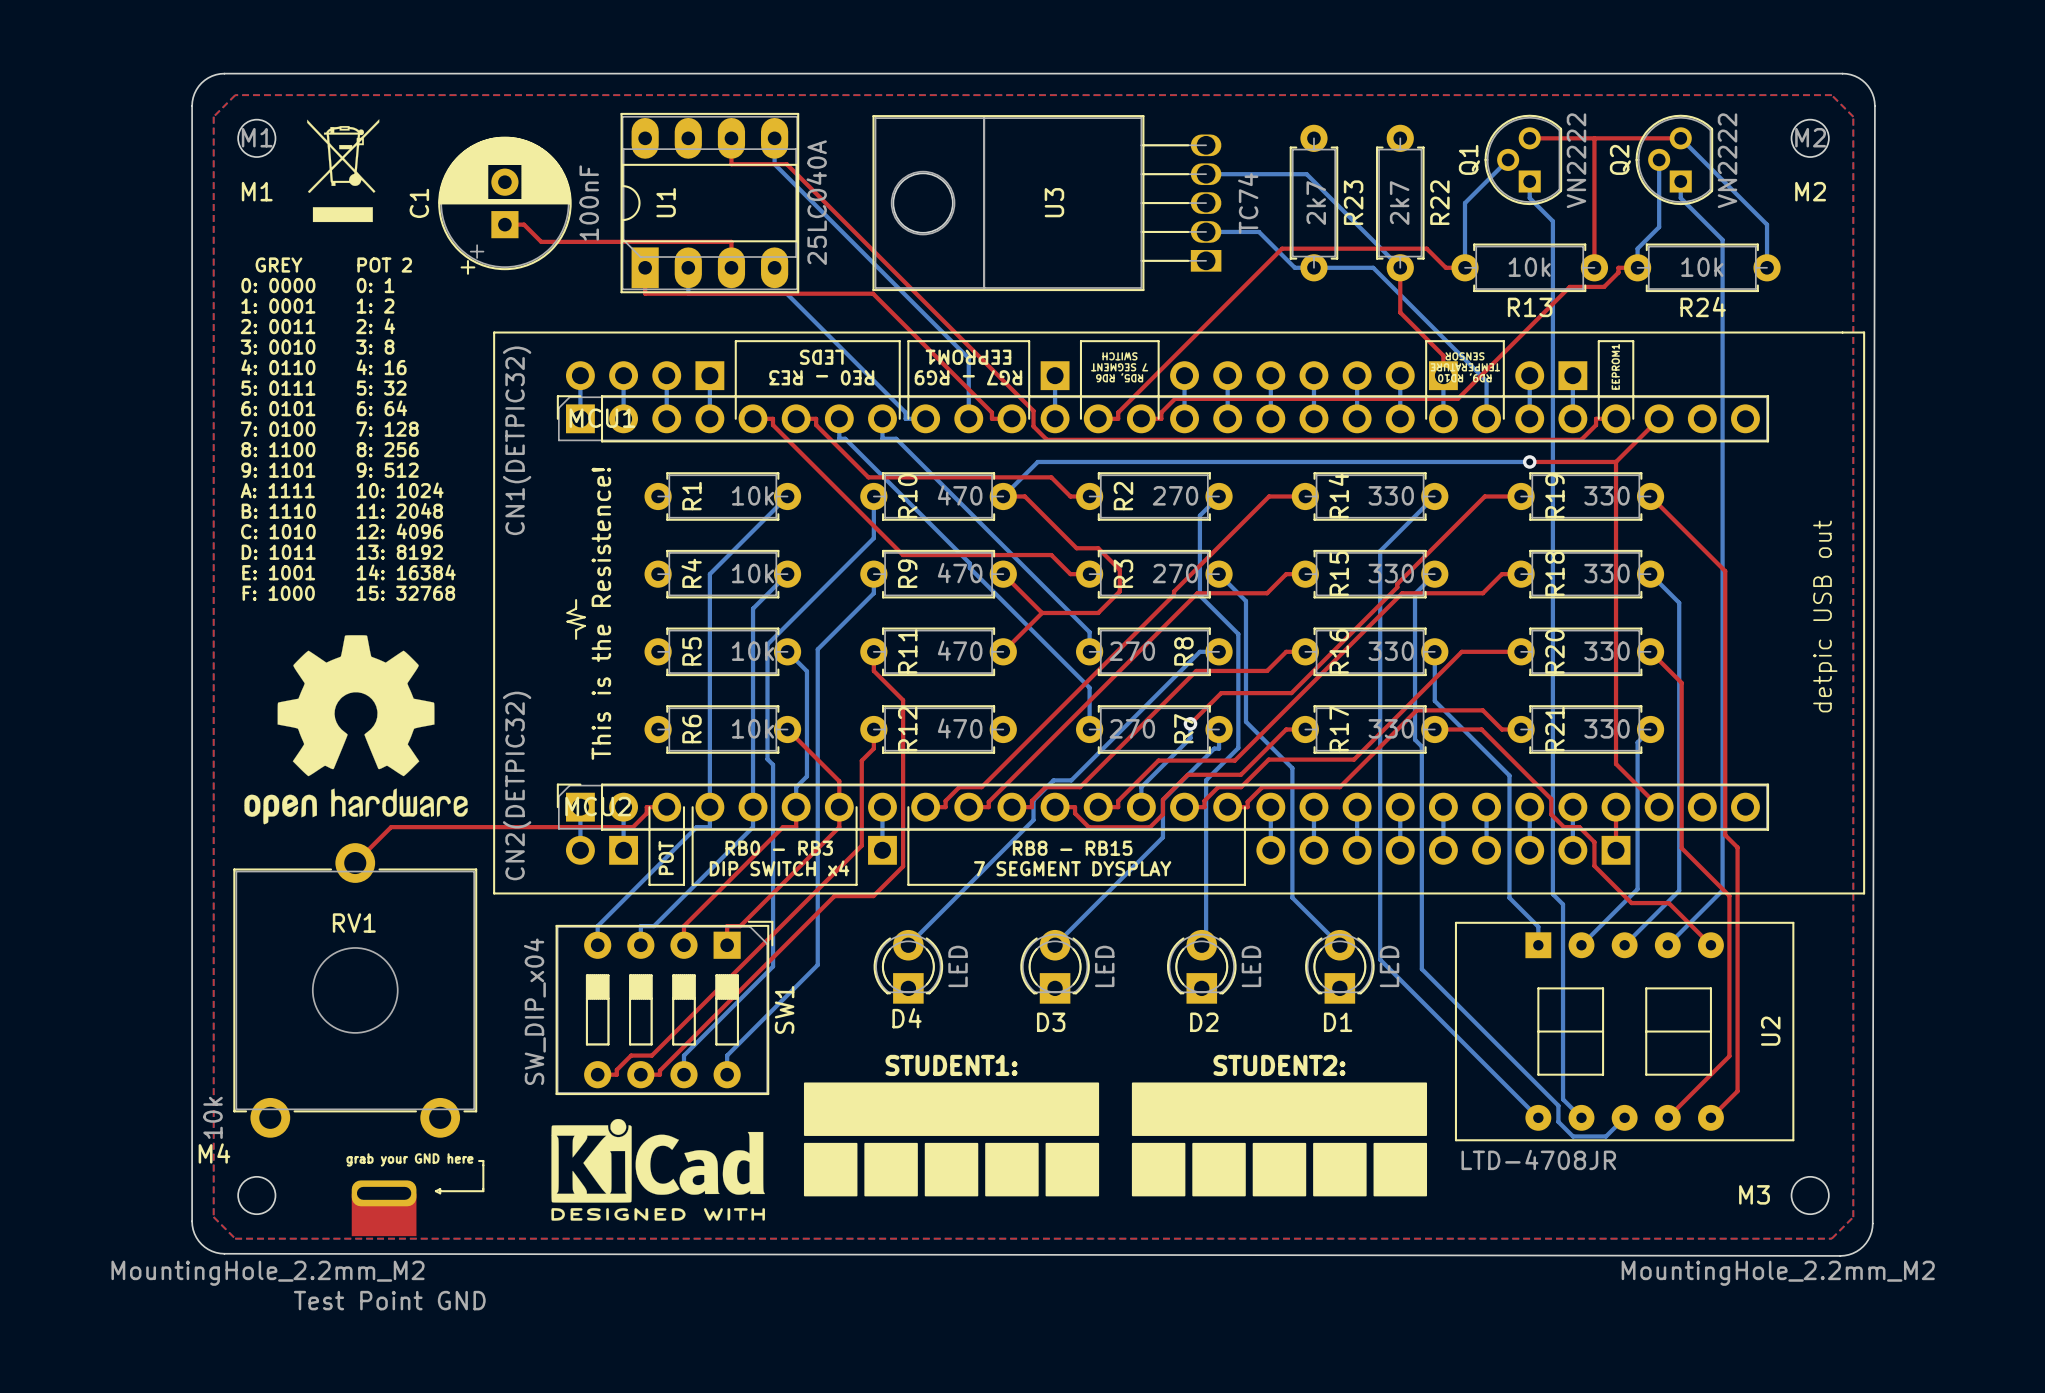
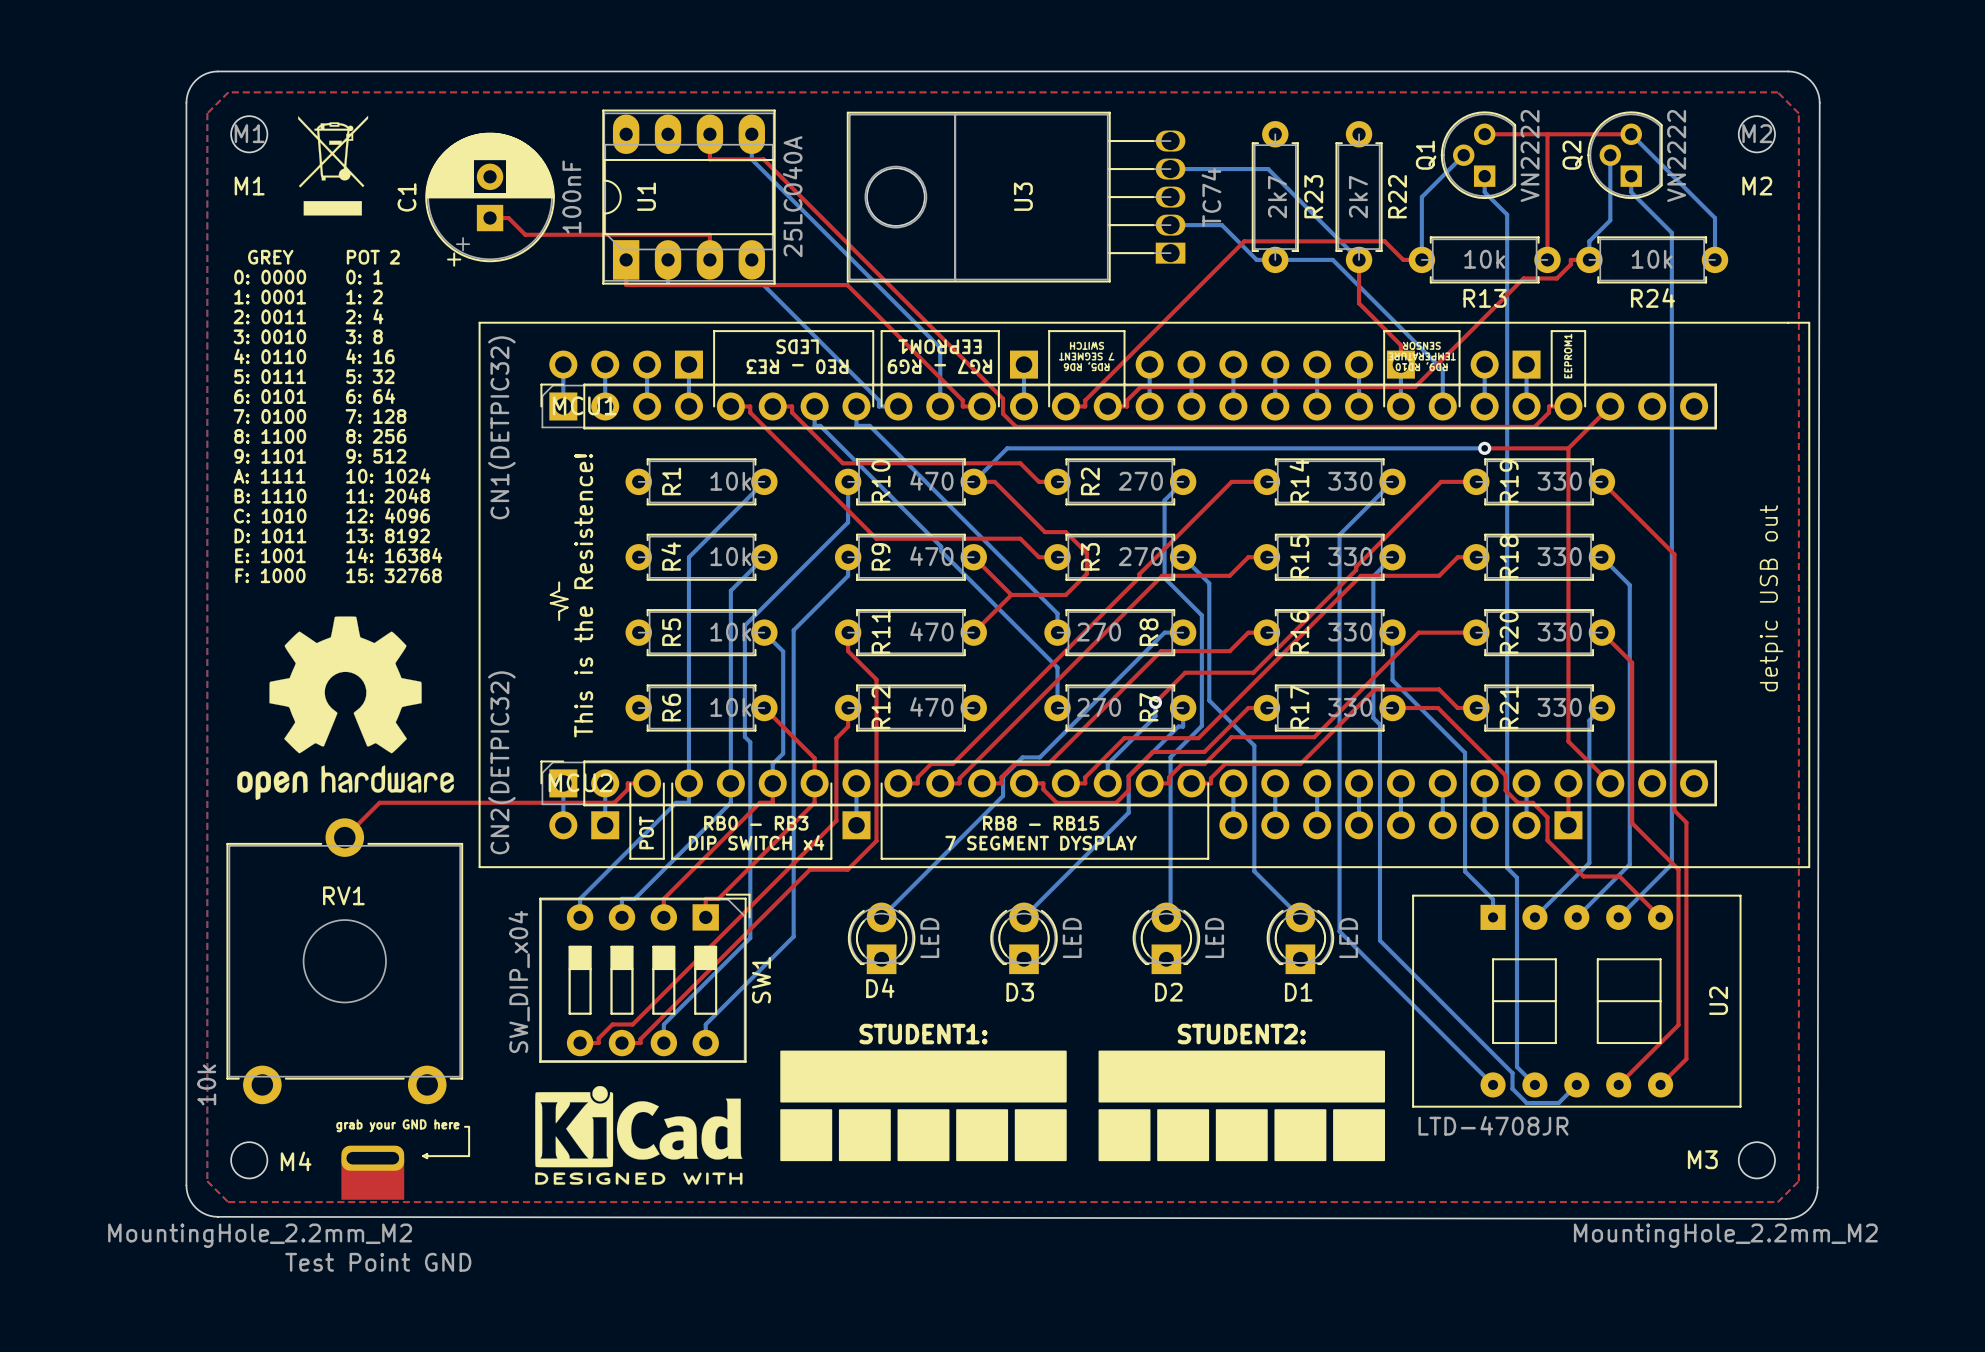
M4 name position: M4 (214, 1153) -> M4 (296, 1161)

